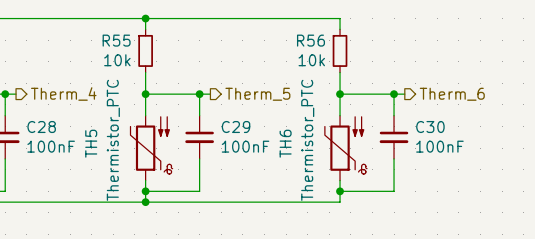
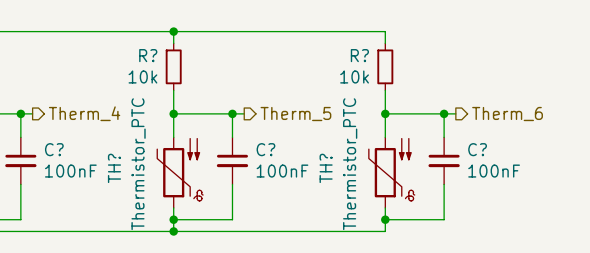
R55 name: R55 (116, 40) -> R? (148, 55)
R56 name: R56 (310, 40) -> R? (359, 55)
C28 name: C28 (41, 127) -> C? (54, 149)
C29 name: C29 (236, 127) -> C? (265, 149)
C30 name: C30 (430, 127) -> C? (477, 149)
TH5 name: TH5 (91, 143) -> TH? (114, 168)
TH6 name: TH6 (285, 143) -> TH? (326, 168)

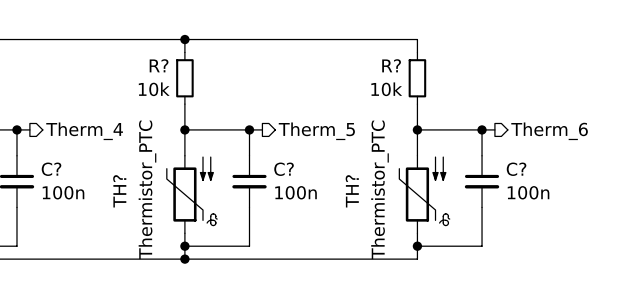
C? value: 100nF (70, 171) -> 100n (63, 192)
C? value: 100nF (282, 171) -> 100n (296, 192)
C? value: 100nF (494, 171) -> 100n (528, 192)

